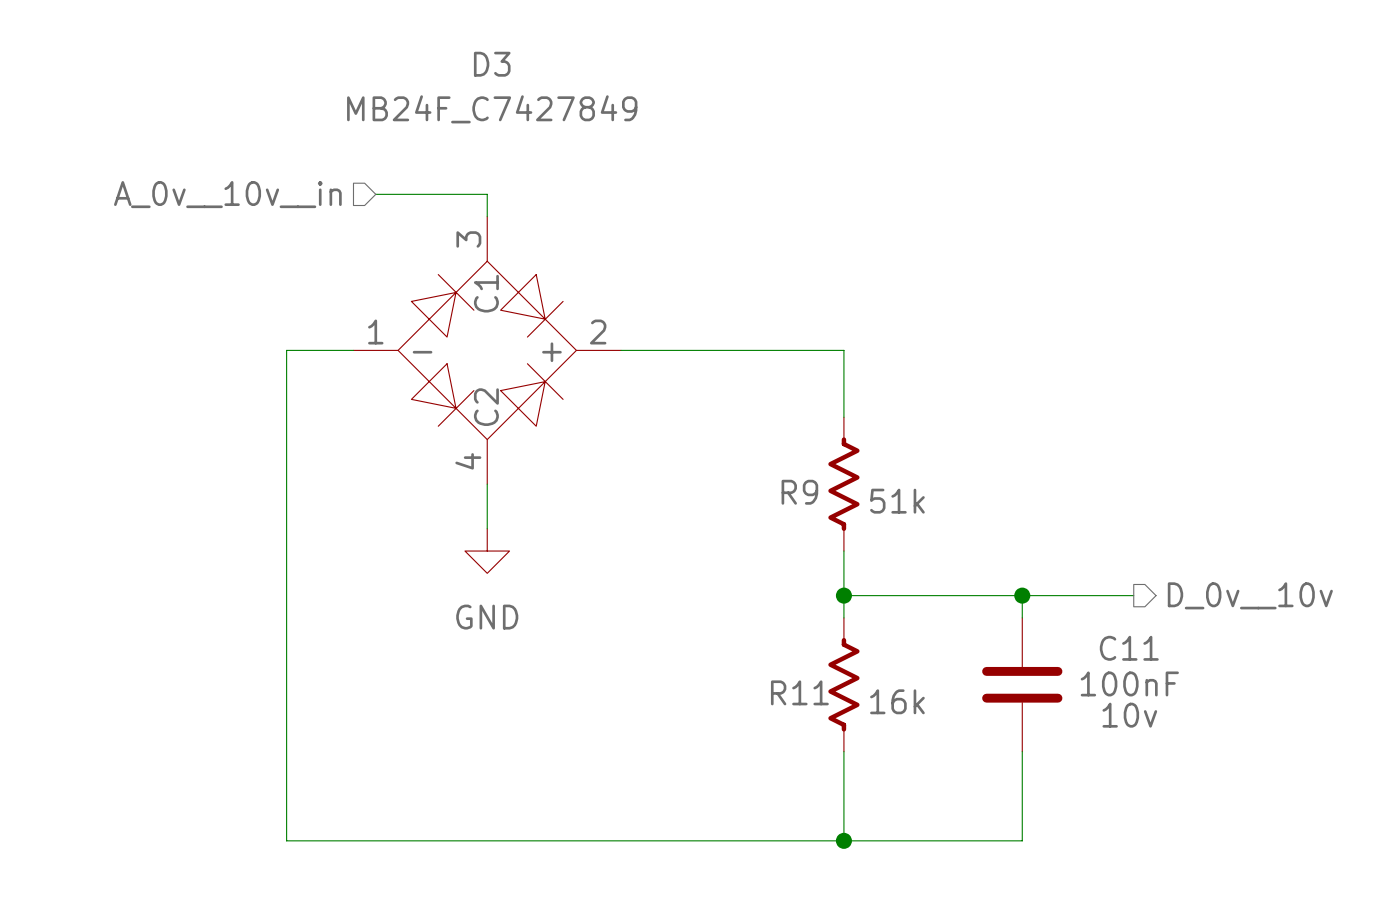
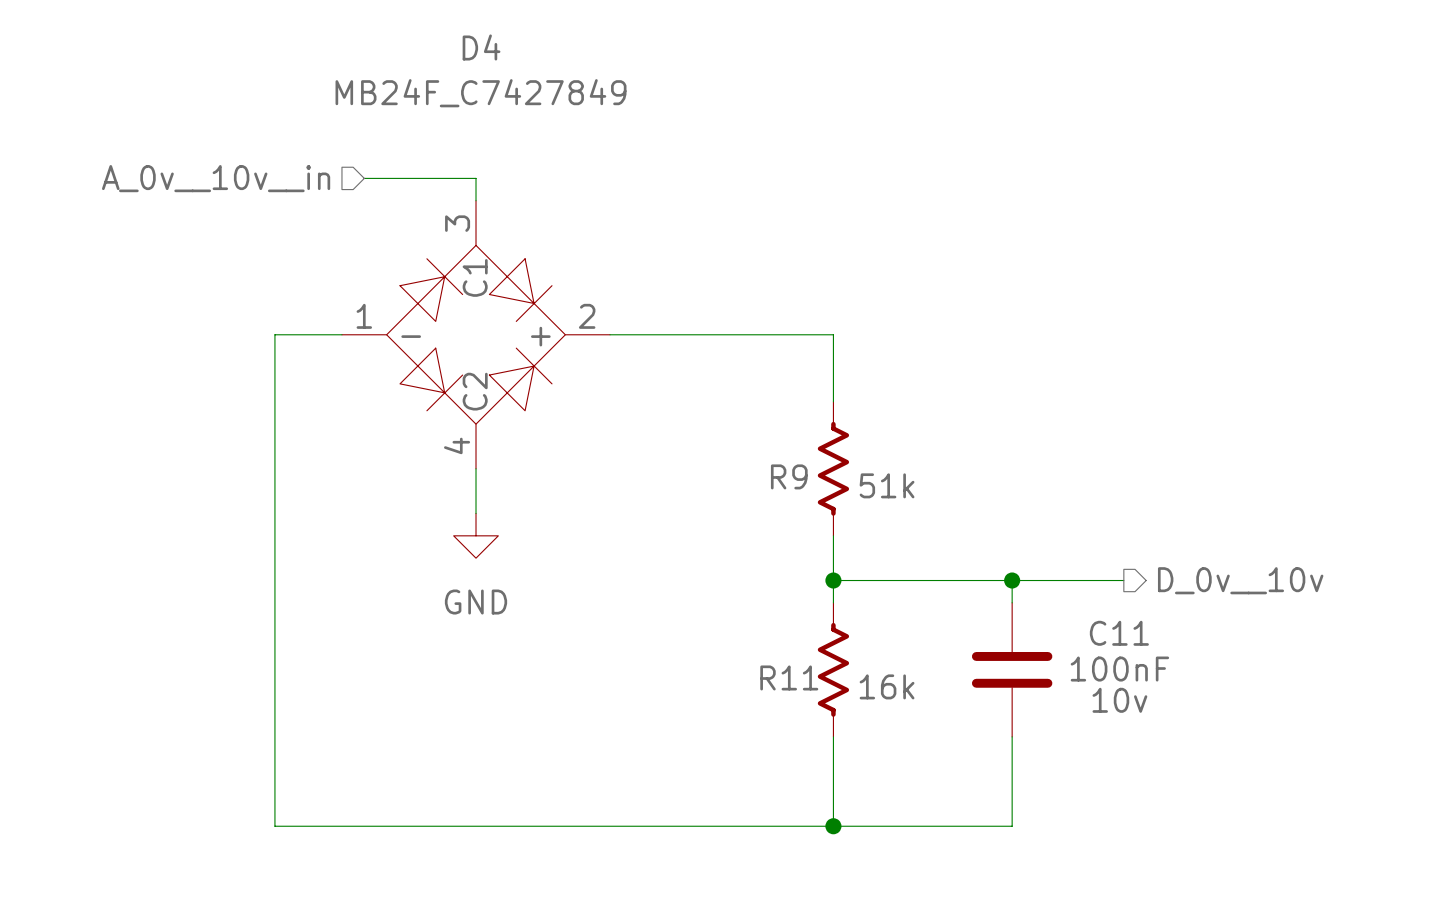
D3 name: D3 (492, 64) -> D4 (481, 47)

